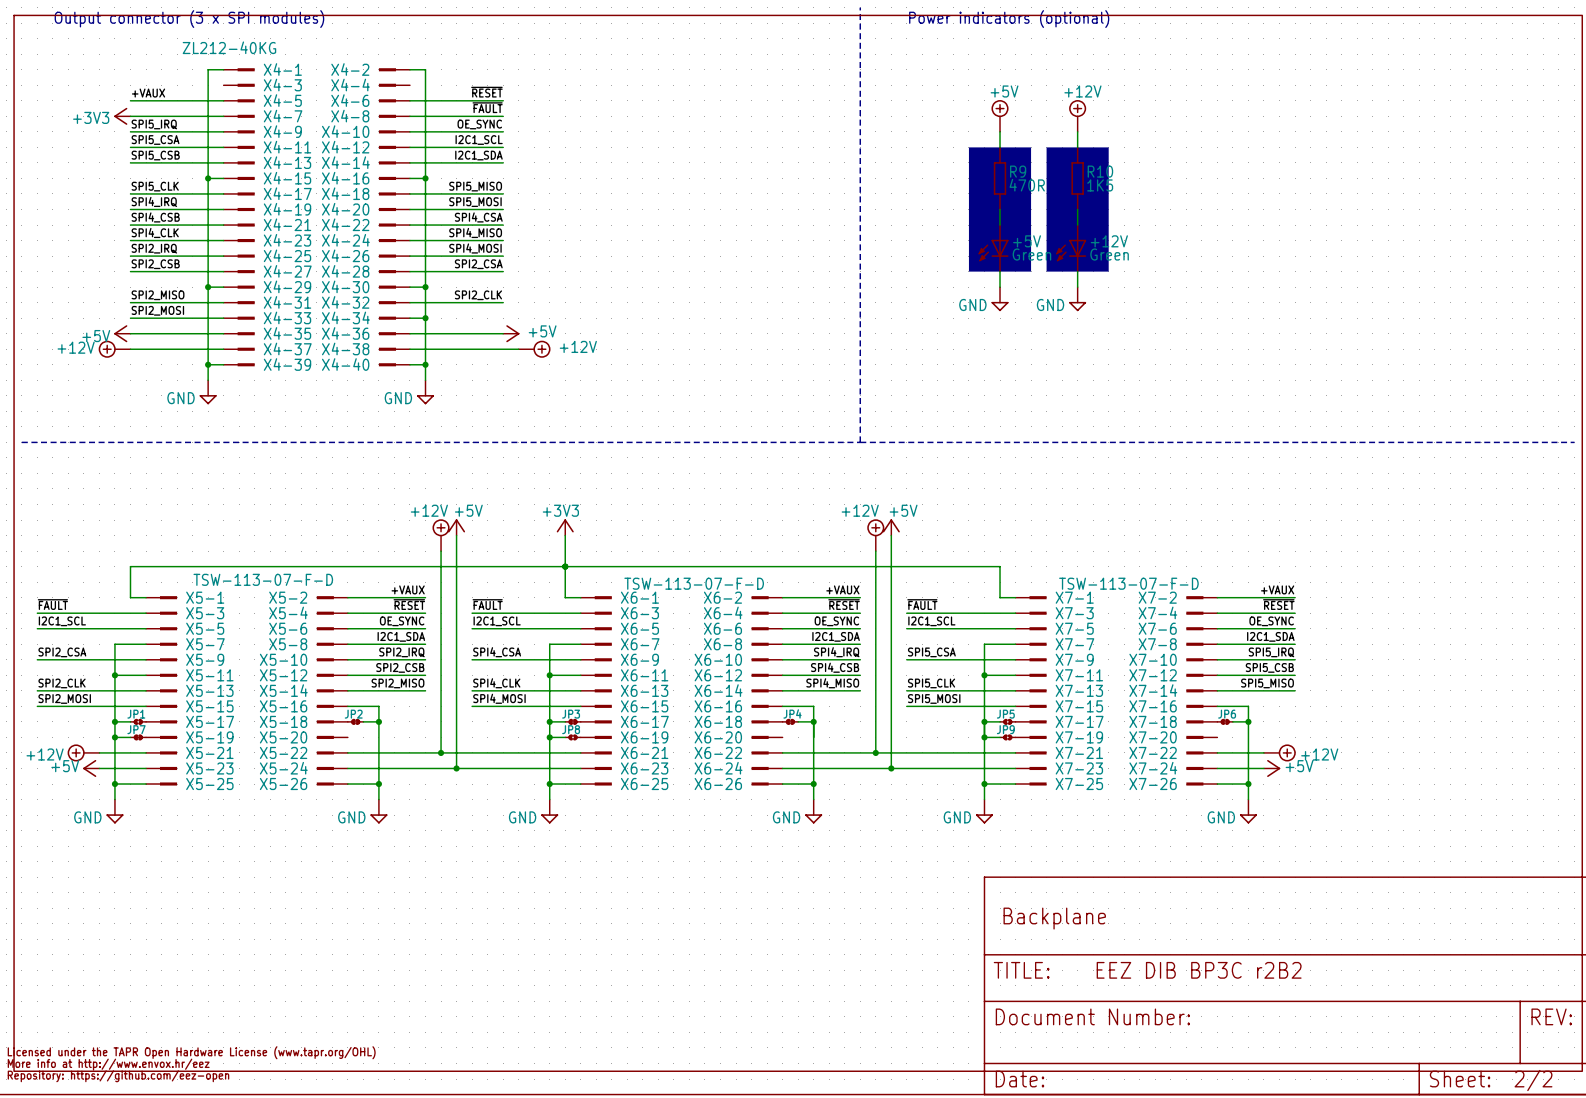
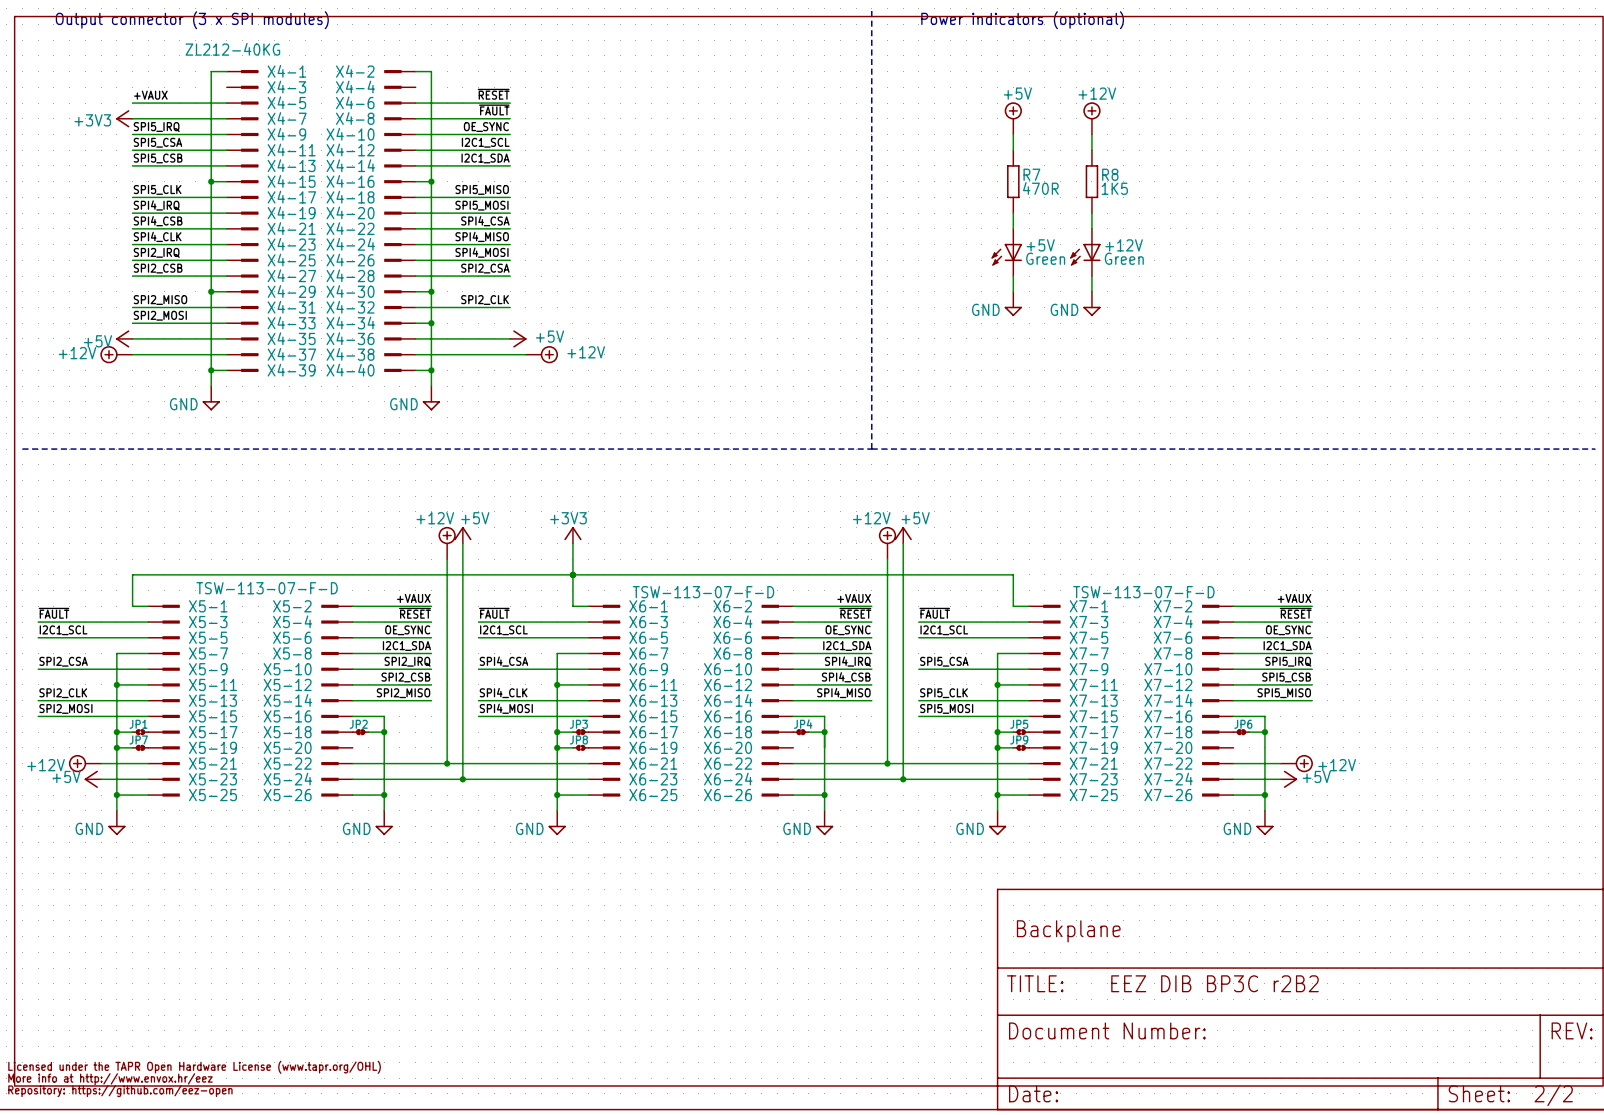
drawing: [968, 147, 1032, 272] -> none
drawing: [1046, 147, 1109, 272] -> none
R9 name: R9 (1018, 171) -> R7 (1031, 174)
R10 name: R10 (1100, 171) -> R8 (1110, 174)

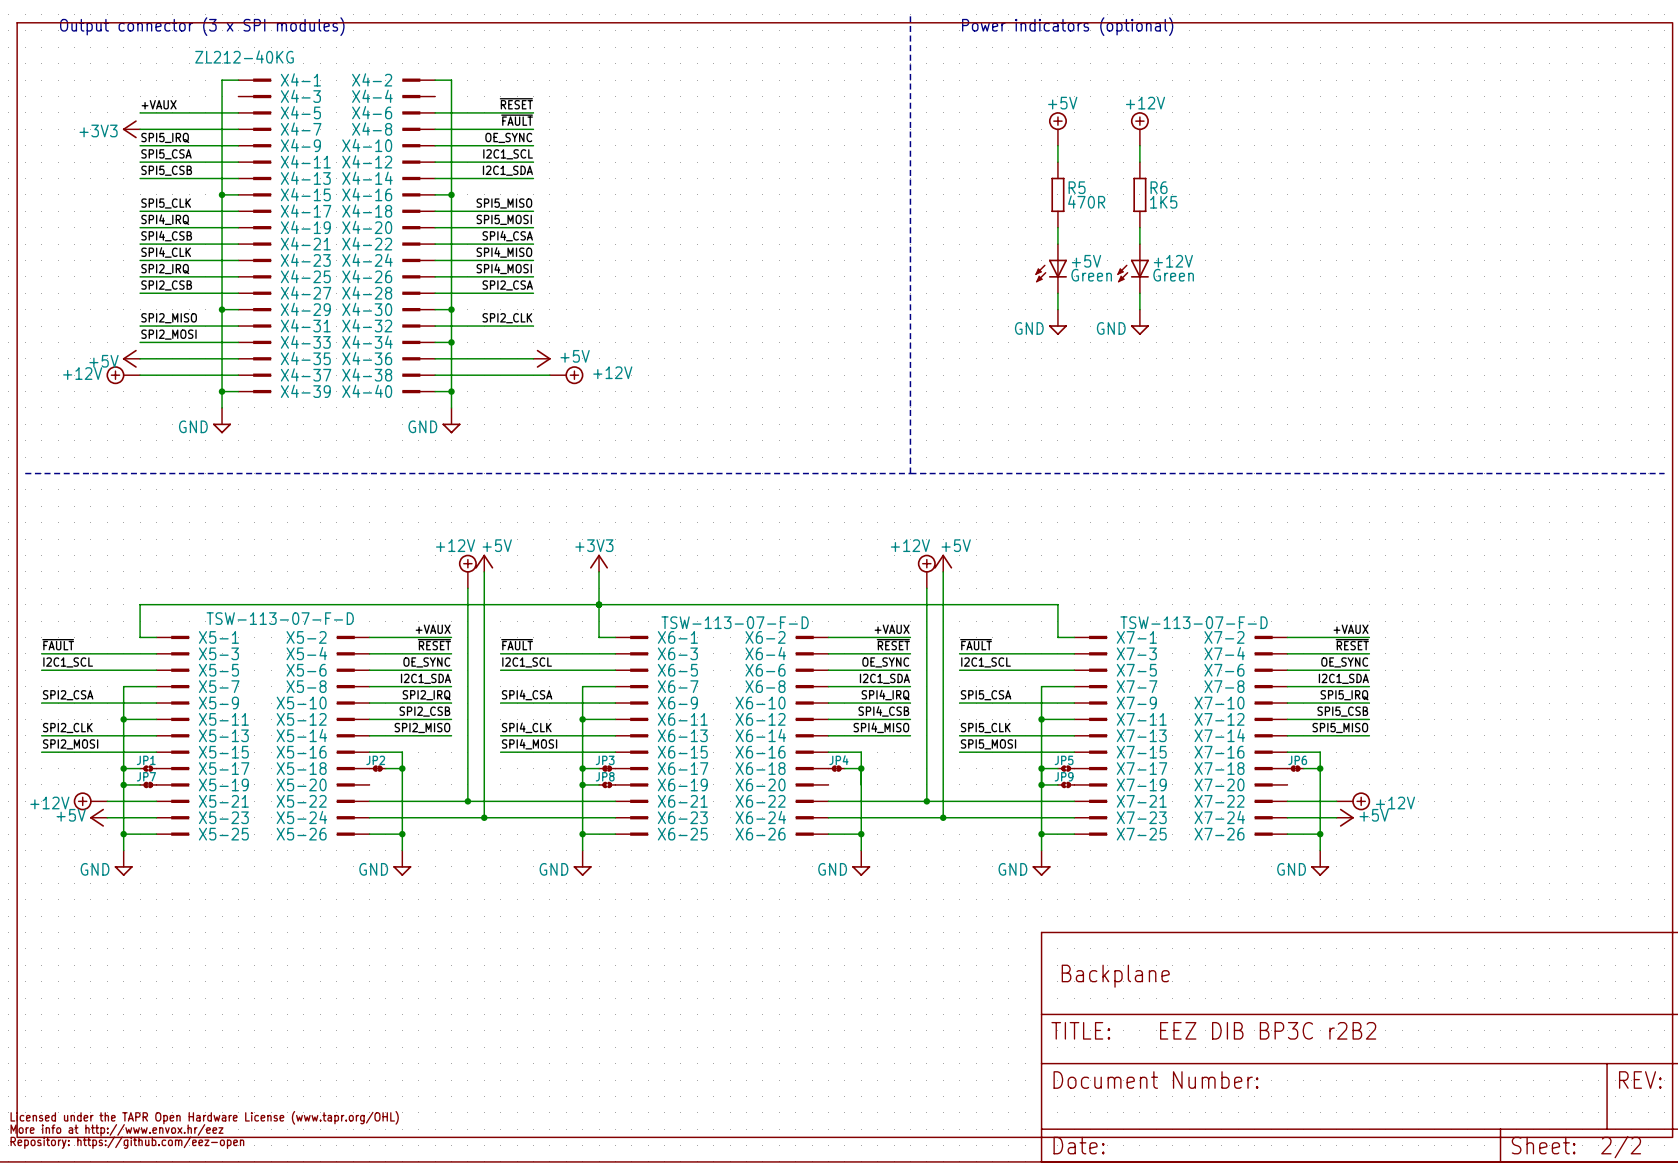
R7 name: R7 (1031, 174) -> R5 (1077, 187)
R8 name: R8 (1110, 174) -> R6 (1159, 187)

